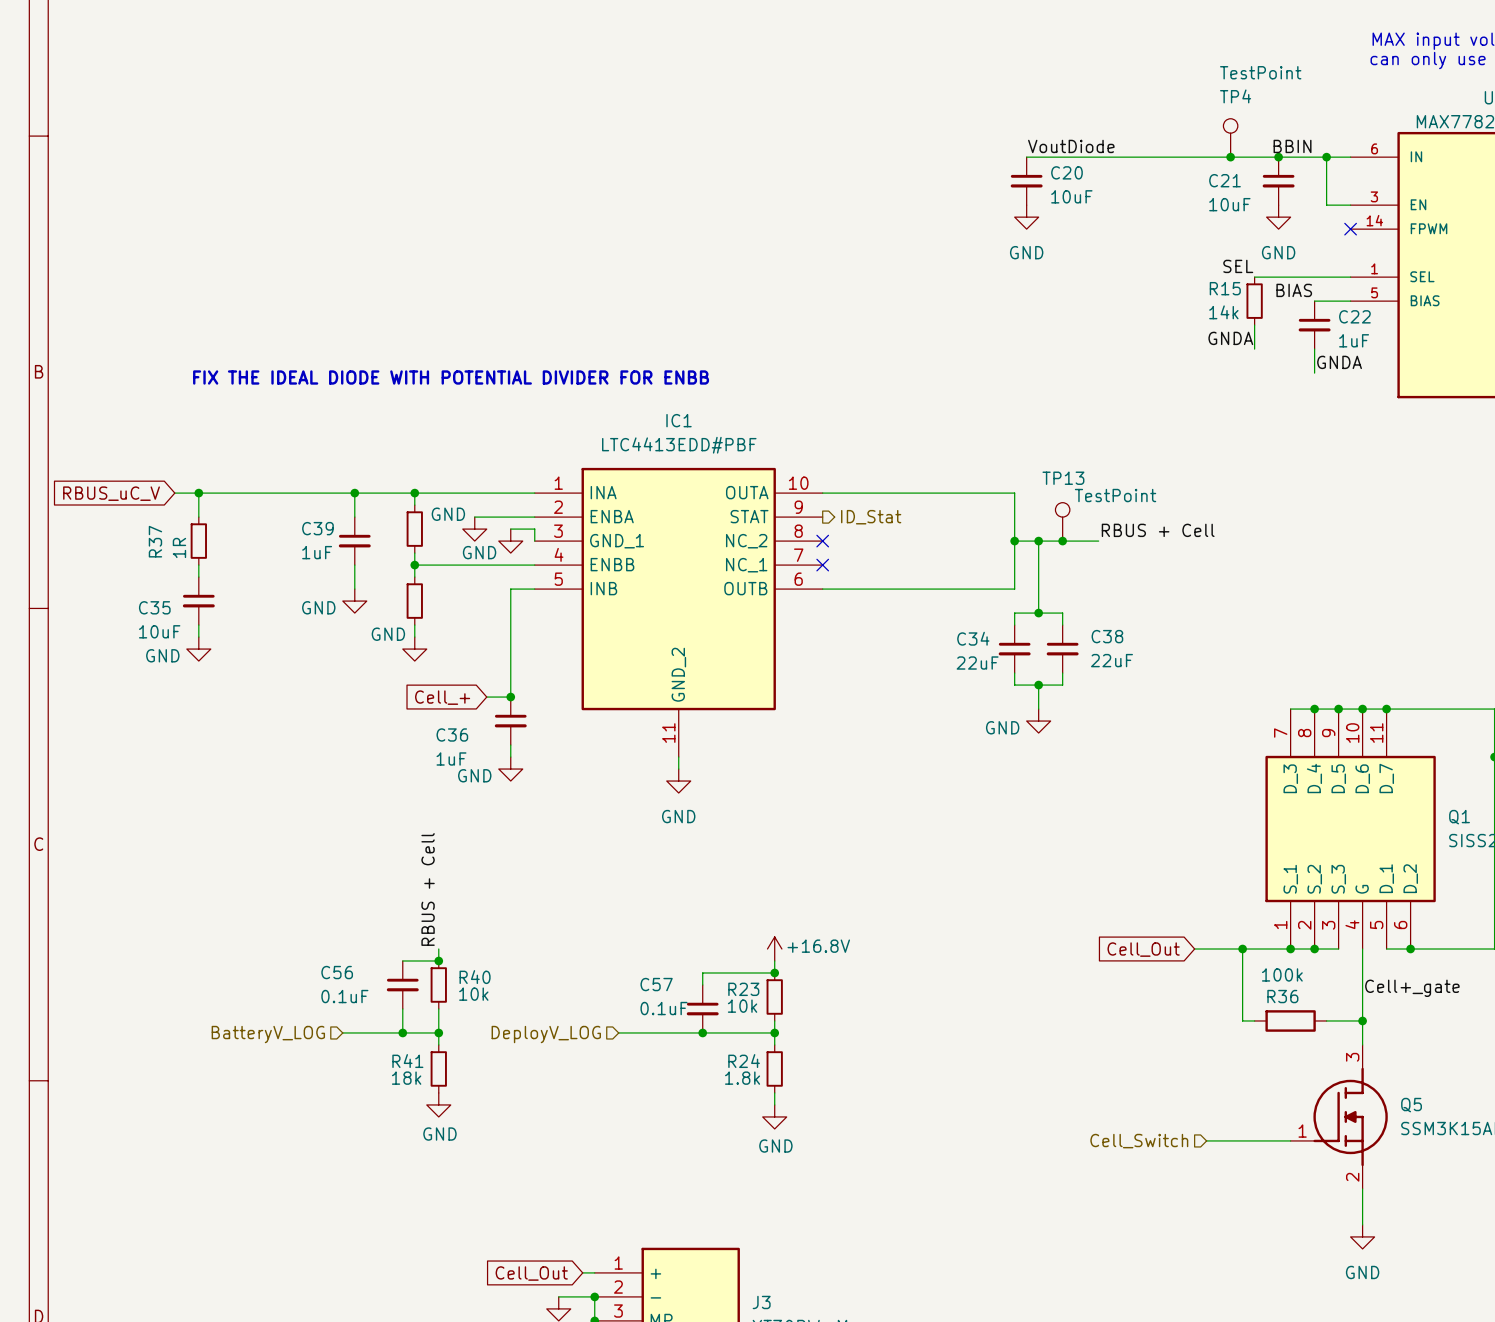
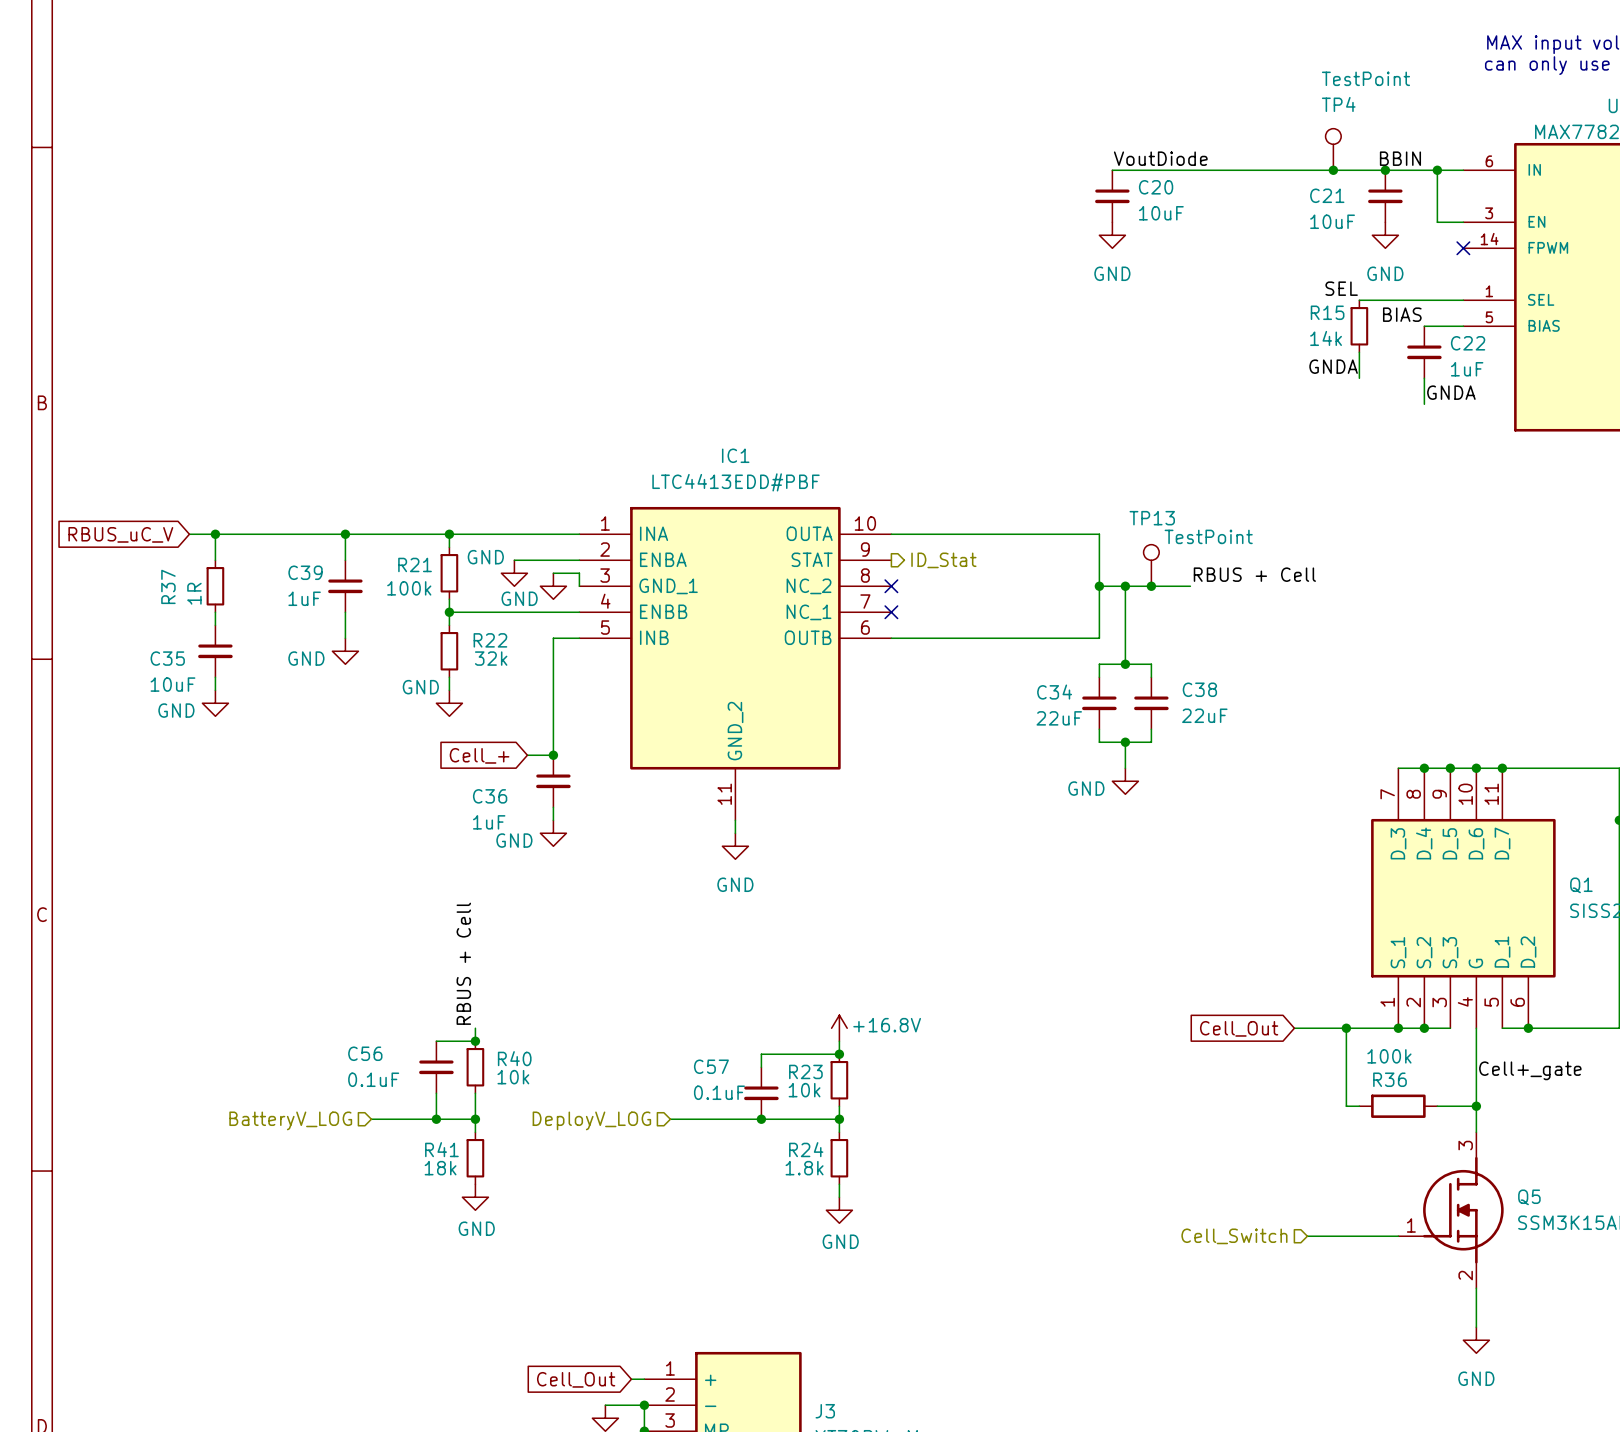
text: FIX THE IDEAL DIODE WITH POTENTIAL DIVIDER FOR ENBB (451, 377) -> none
wire: (354, 493) (354, 517) -> (345, 534) (345, 560)
junction position: (354, 493) -> (345, 534)
R21 name: none -> R21 (415, 564)
C39 position: (354, 541) -> (345, 586)
R21 value: none -> 100k (409, 588)
wire: (354, 565) (354, 589) -> (345, 612) (345, 638)
R22 name: none -> R22 (490, 640)
power symbol position: GND (354, 601) -> GND (345, 651)
R22 value: none -> 32k (491, 658)

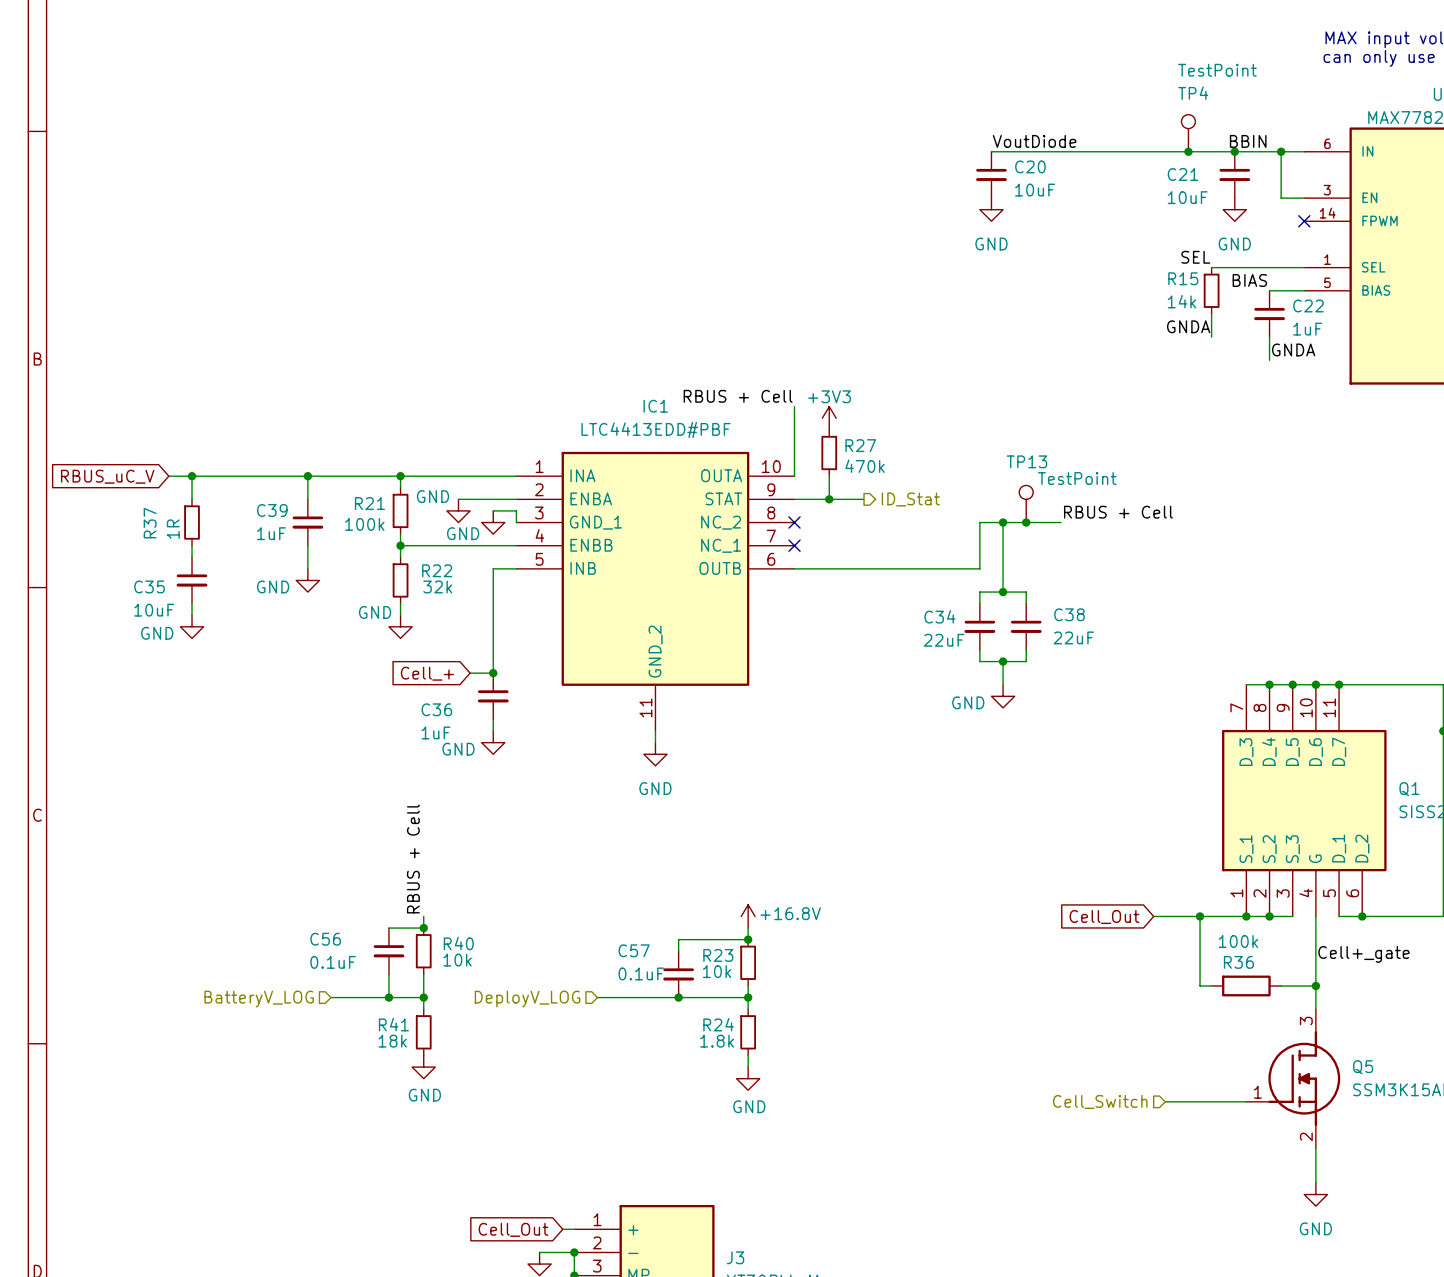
label: none -> RBUS + Cell (738, 396)
power symbol: none -> +3V3 (829, 418)
R27: none -> 470k (829, 453)
wire: (891, 534) (1099, 534) (1099, 586) -> (794, 476) (794, 406)
wire: none -> (829, 476) (829, 499)
wire: none -> (794, 499) (864, 499)
junction: none -> (829, 499)
hierarchical label position: ID_Stat (943, 560) -> ID_Stat (910, 499)
junction: (1099, 586) -> none

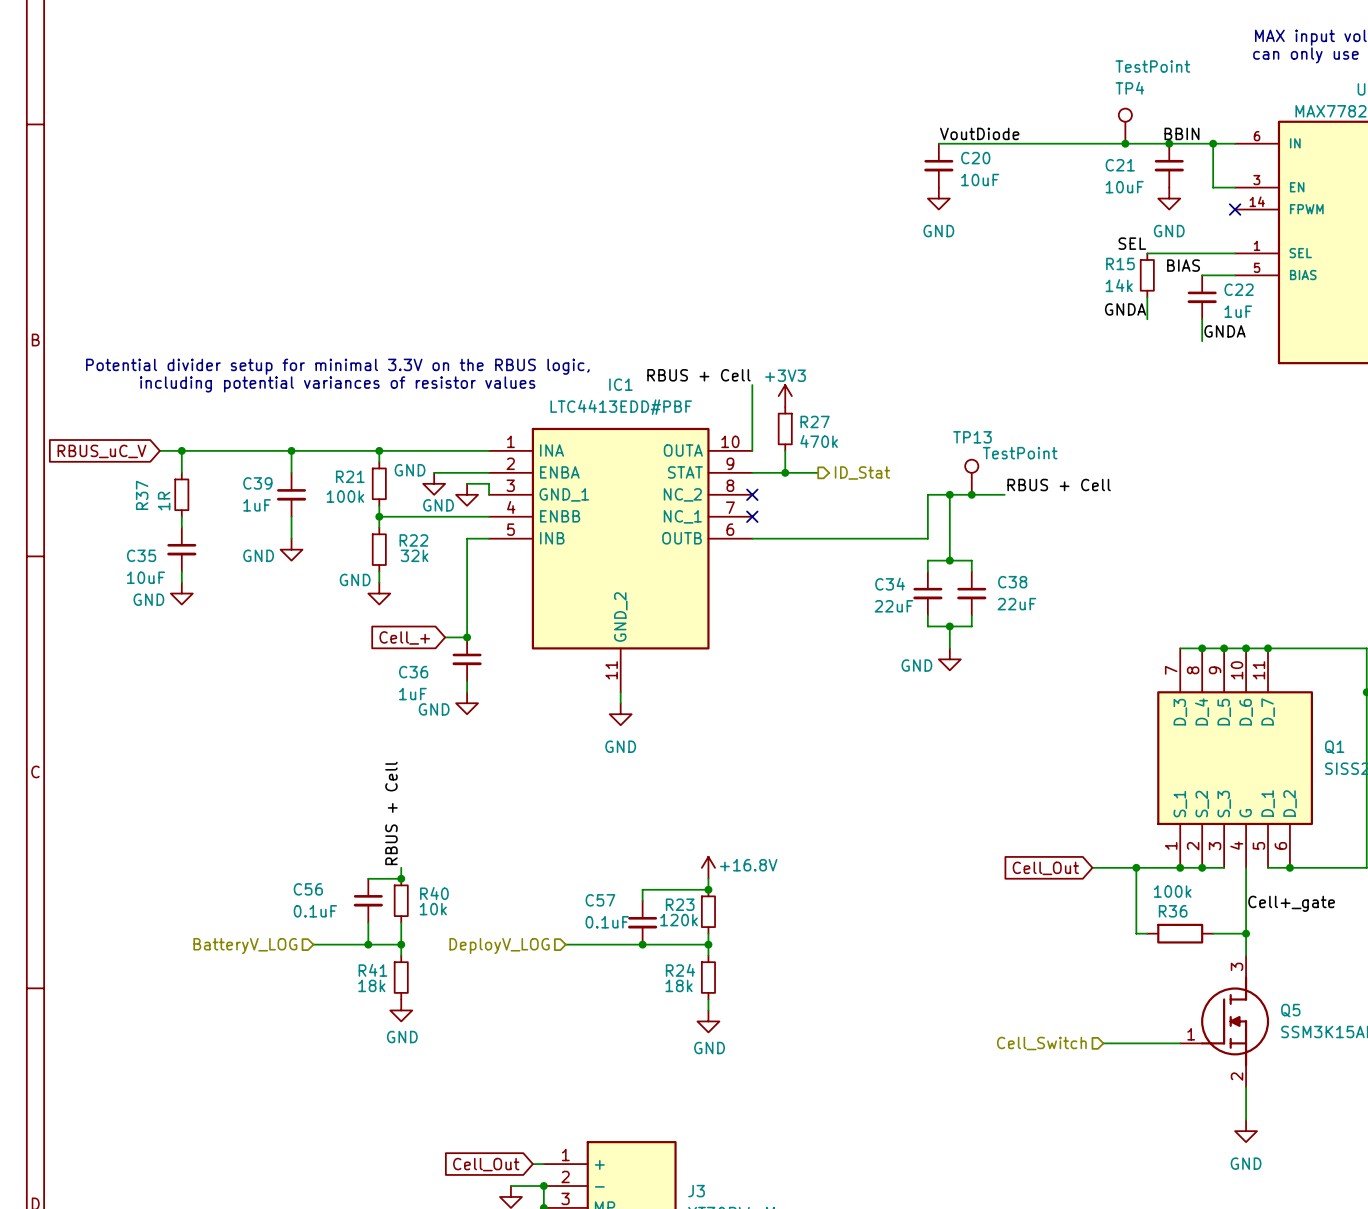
text: none -> Potential divider setup for minimal 3.3V on the RBUS logic, (337, 366)
text: none -> including potential variances of resistor values (337, 384)
R23 value: 10k (717, 971) -> 120k (679, 920)
R24 value: 1.8k (717, 1041) -> 18k (679, 985)

